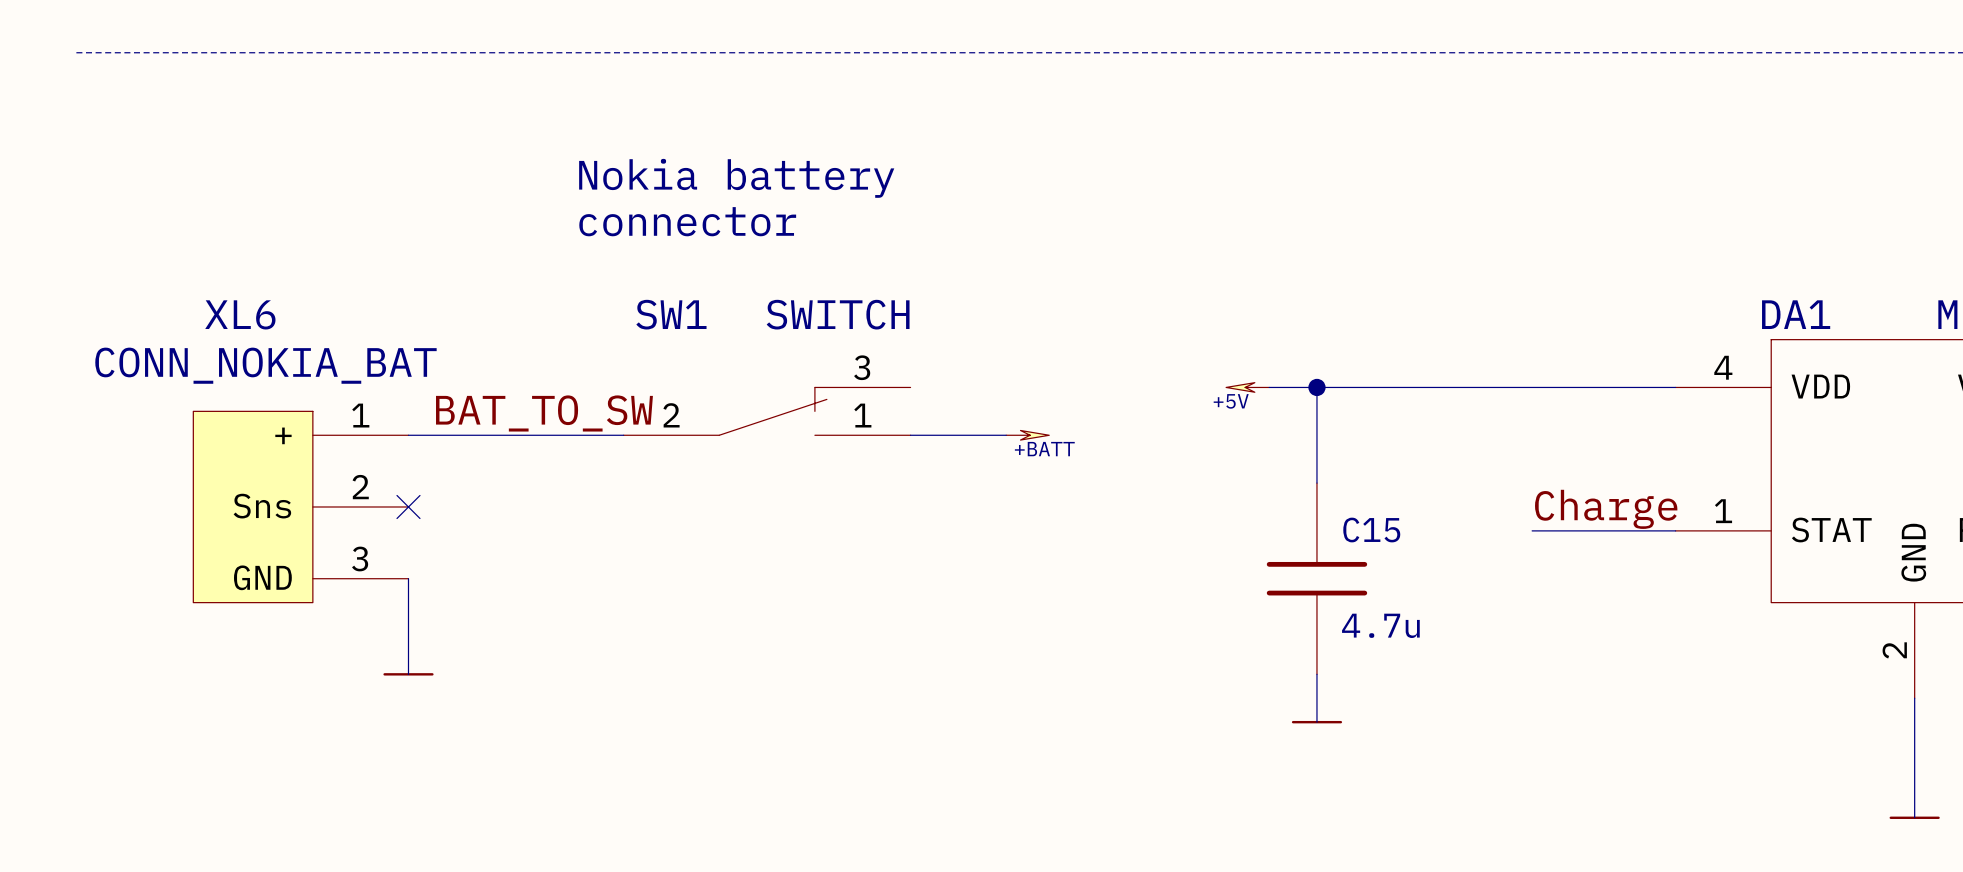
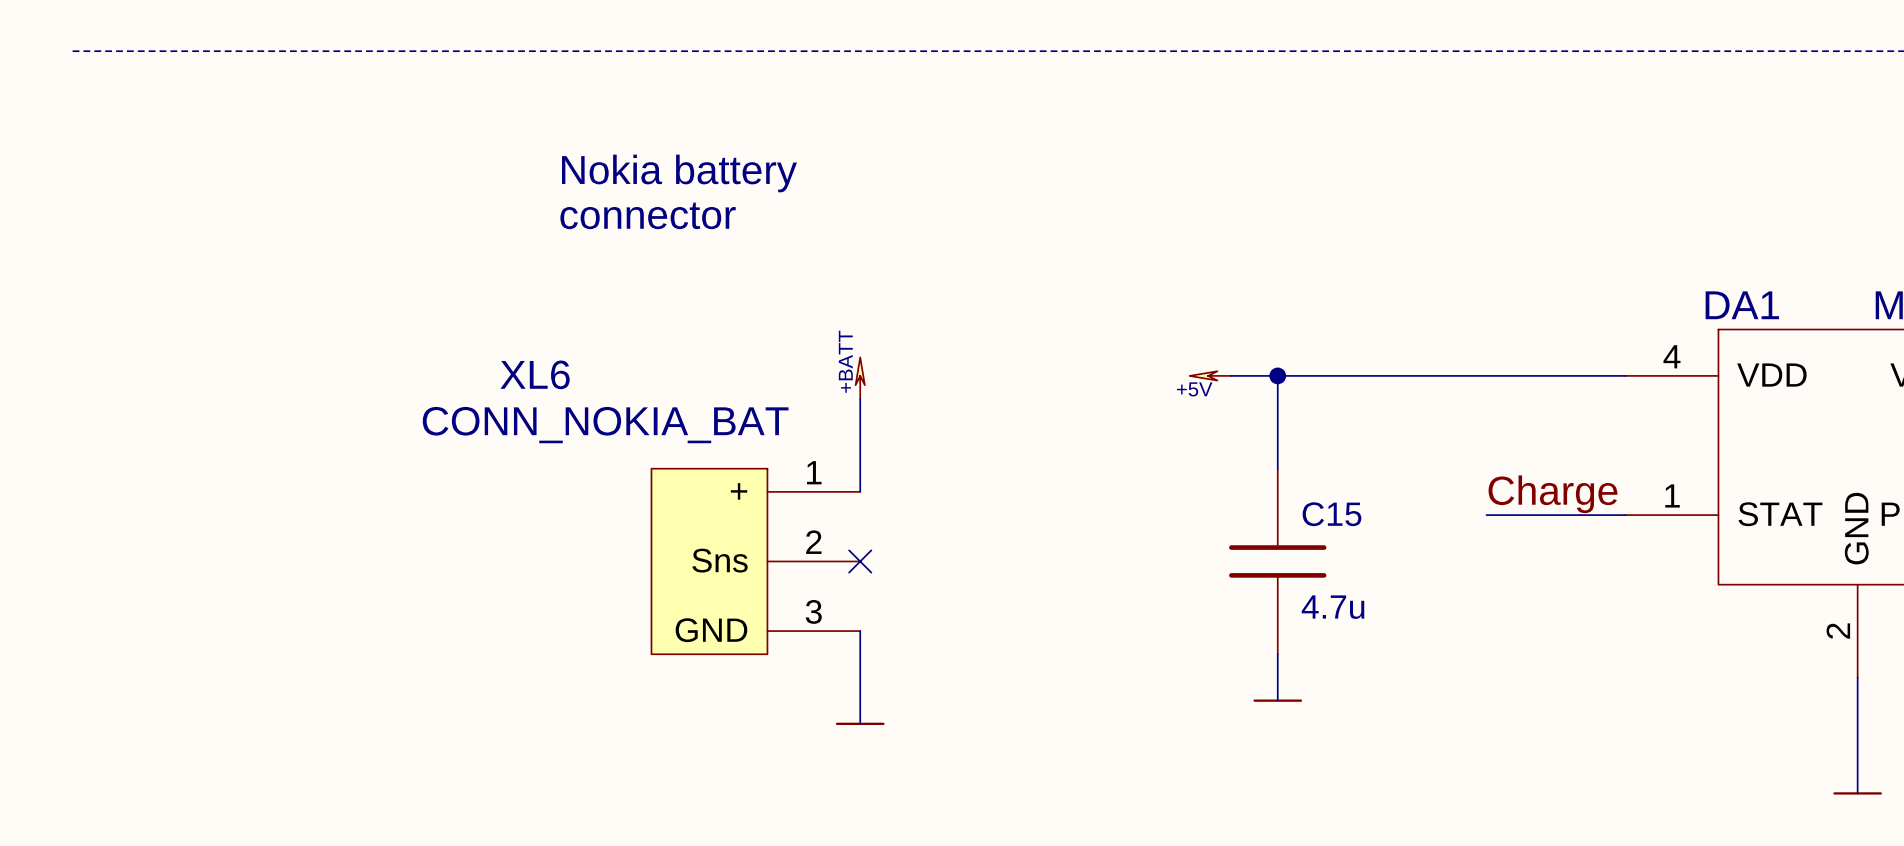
XL6 name position: XL6 (240, 314) -> XL6 (535, 374)
XL6 value position: CONN_NOKIA_BAT (265, 365) -> CONN_NOKIA_BAT (605, 425)
SW1: SWITCH (767, 411) -> none
wire: none -> (860, 399) (860, 491)
label: BAT_TO_SW (544, 413) -> none
wire: (408, 435) (623, 435) -> none
wire: (910, 435) (1006, 435) -> none
power symbol rotation: 0° (1027, 435) -> 90° counterclockwise (860, 378)
power symbol position: +BATT (1027, 435) -> +BATT (860, 378)
XL6 position: (300, 506) -> (755, 561)
no-connect mark: (408, 506) -> none
wire: (408, 578) (408, 674) -> none
no-connect mark: none -> (860, 561)
wire: none -> (860, 631) (860, 723)
power symbol: (408, 674) -> none
power symbol: none -> (860, 723)

